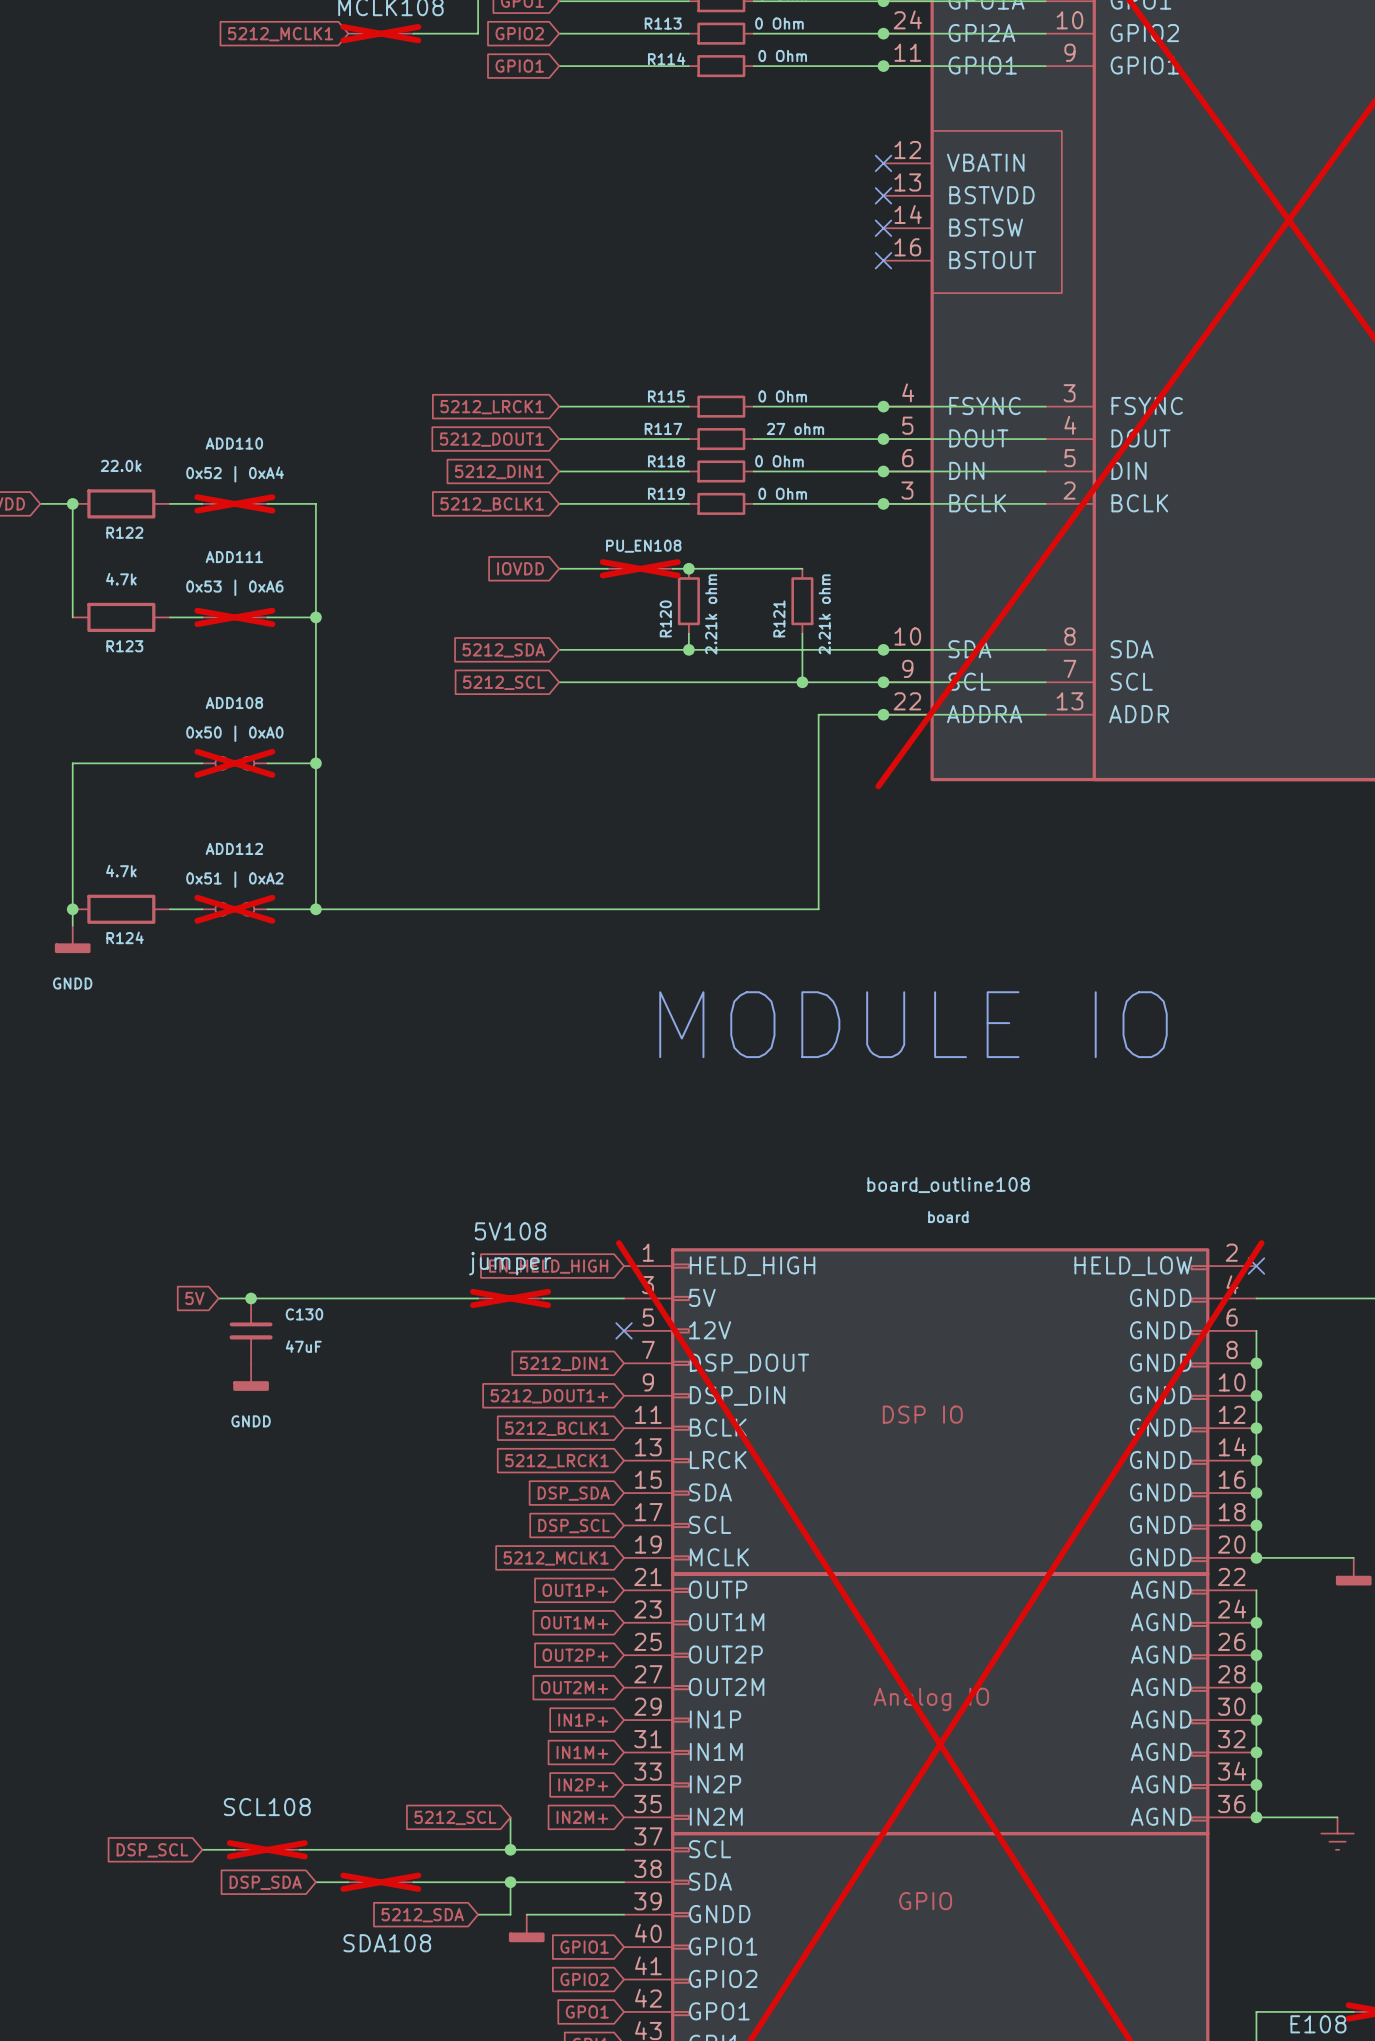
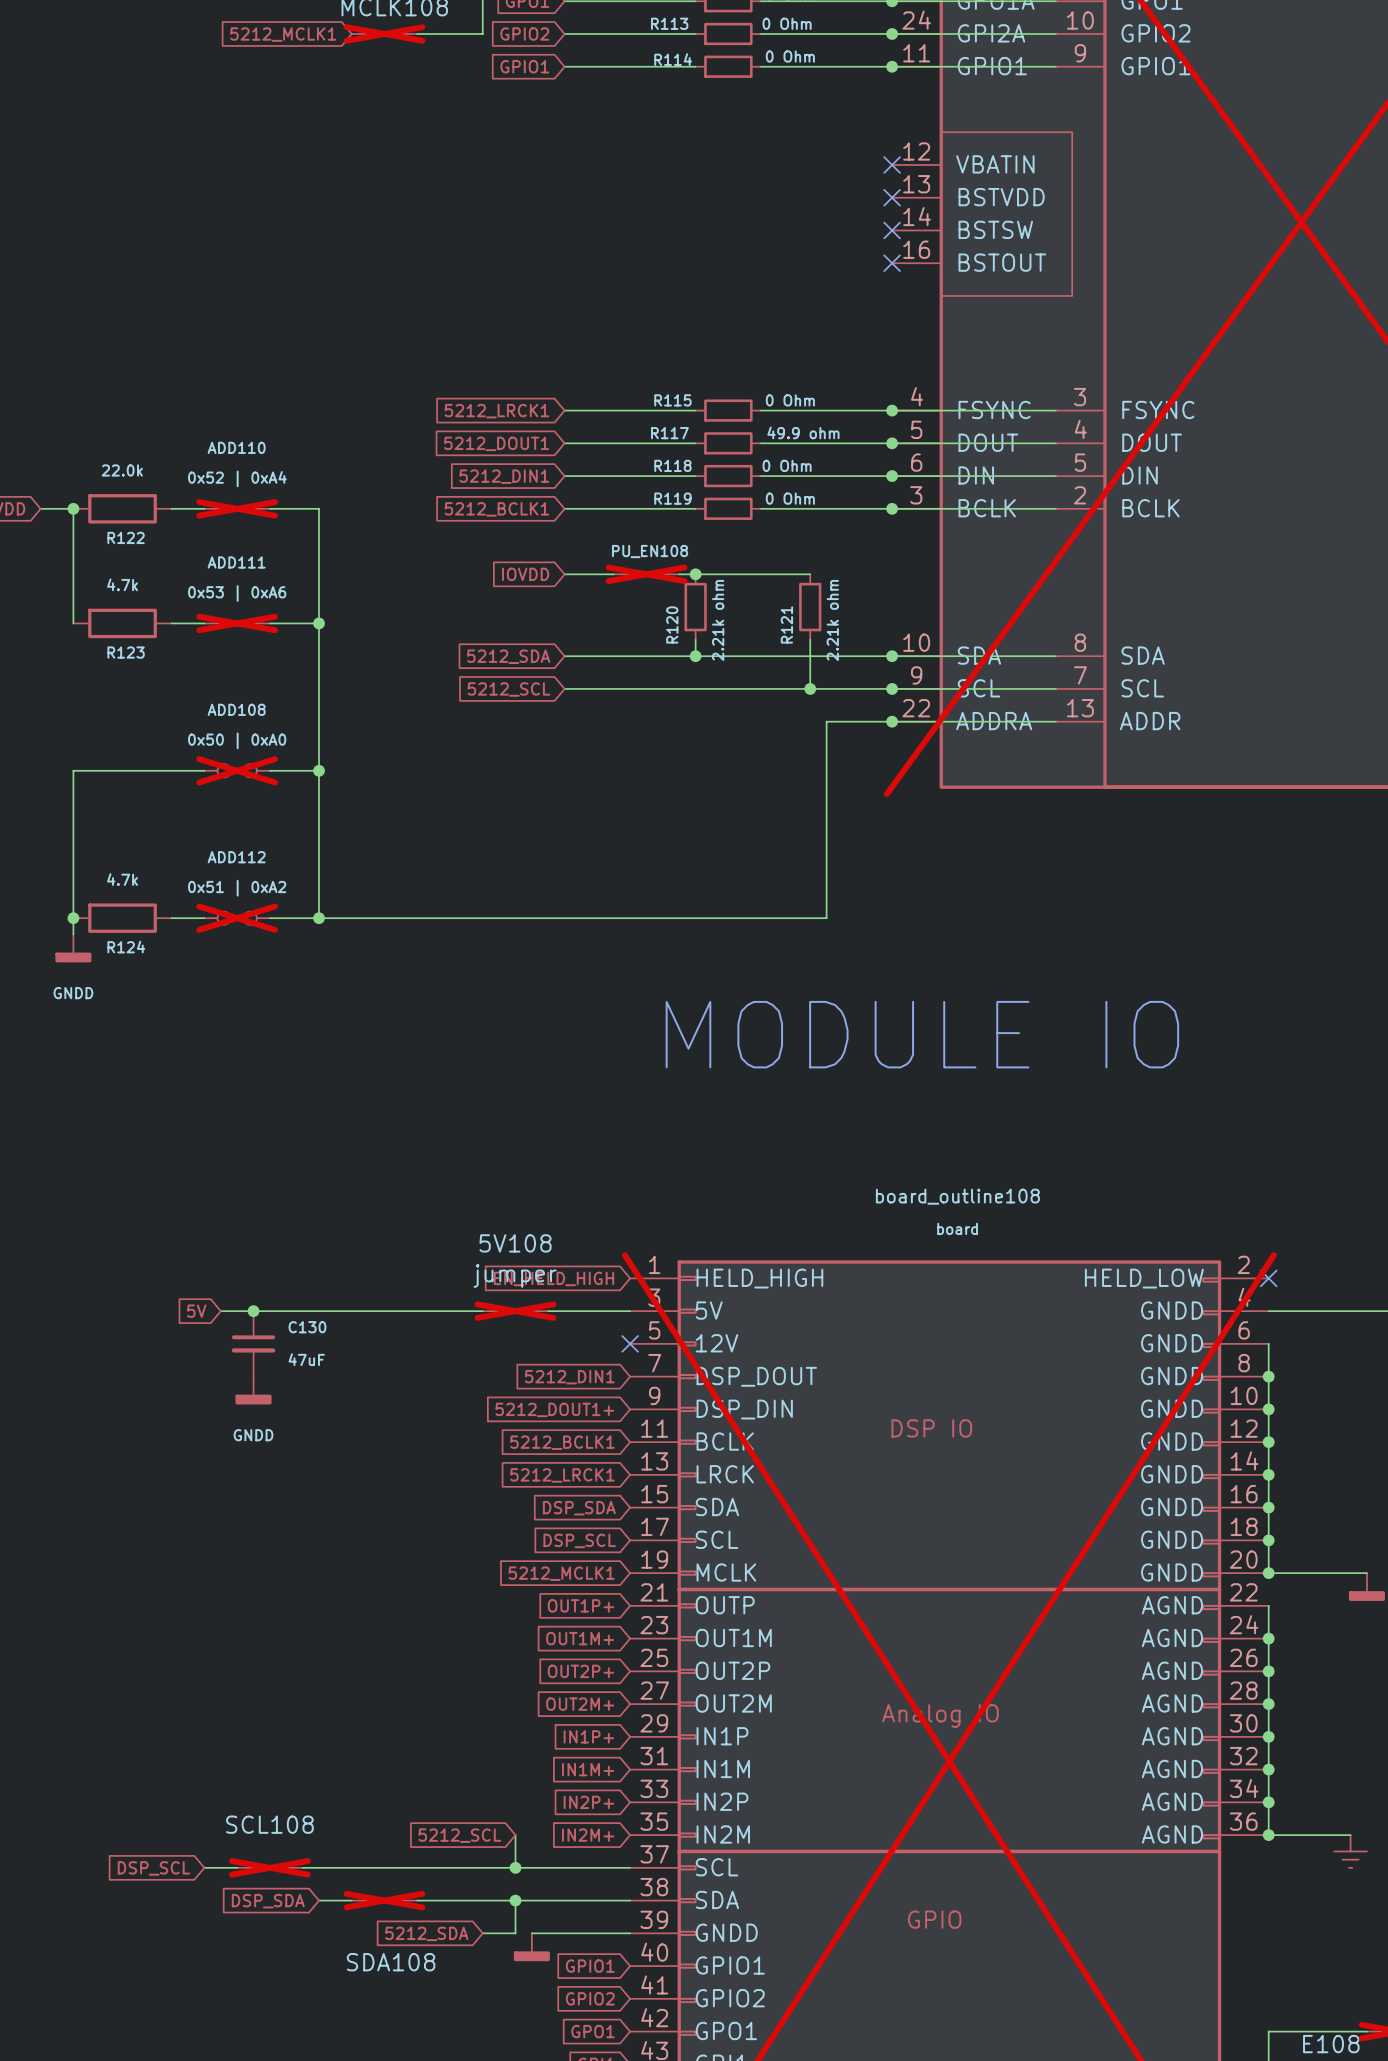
R117 value: 27 ohm (795, 428) -> 49.9 ohm (803, 432)

